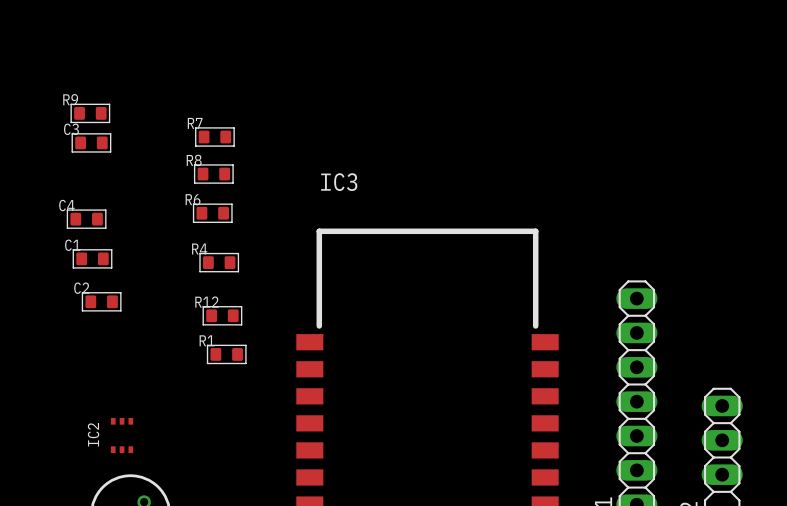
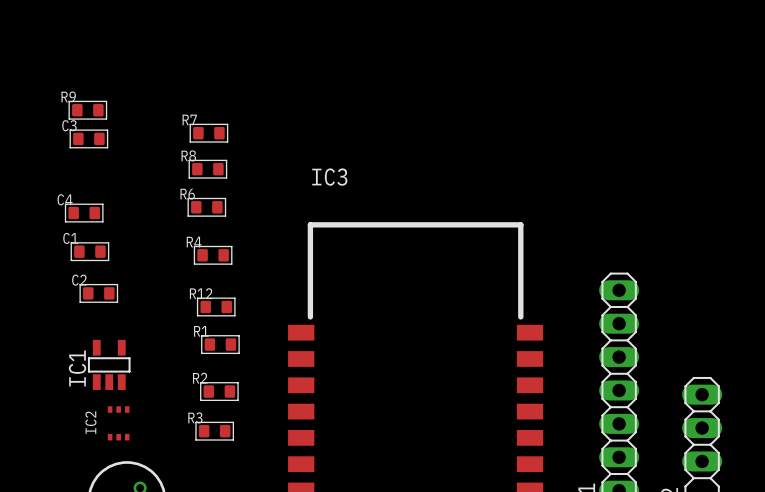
IC1: none -> (109, 364)
R2: none -> (219, 391)
R3: none -> (214, 431)

